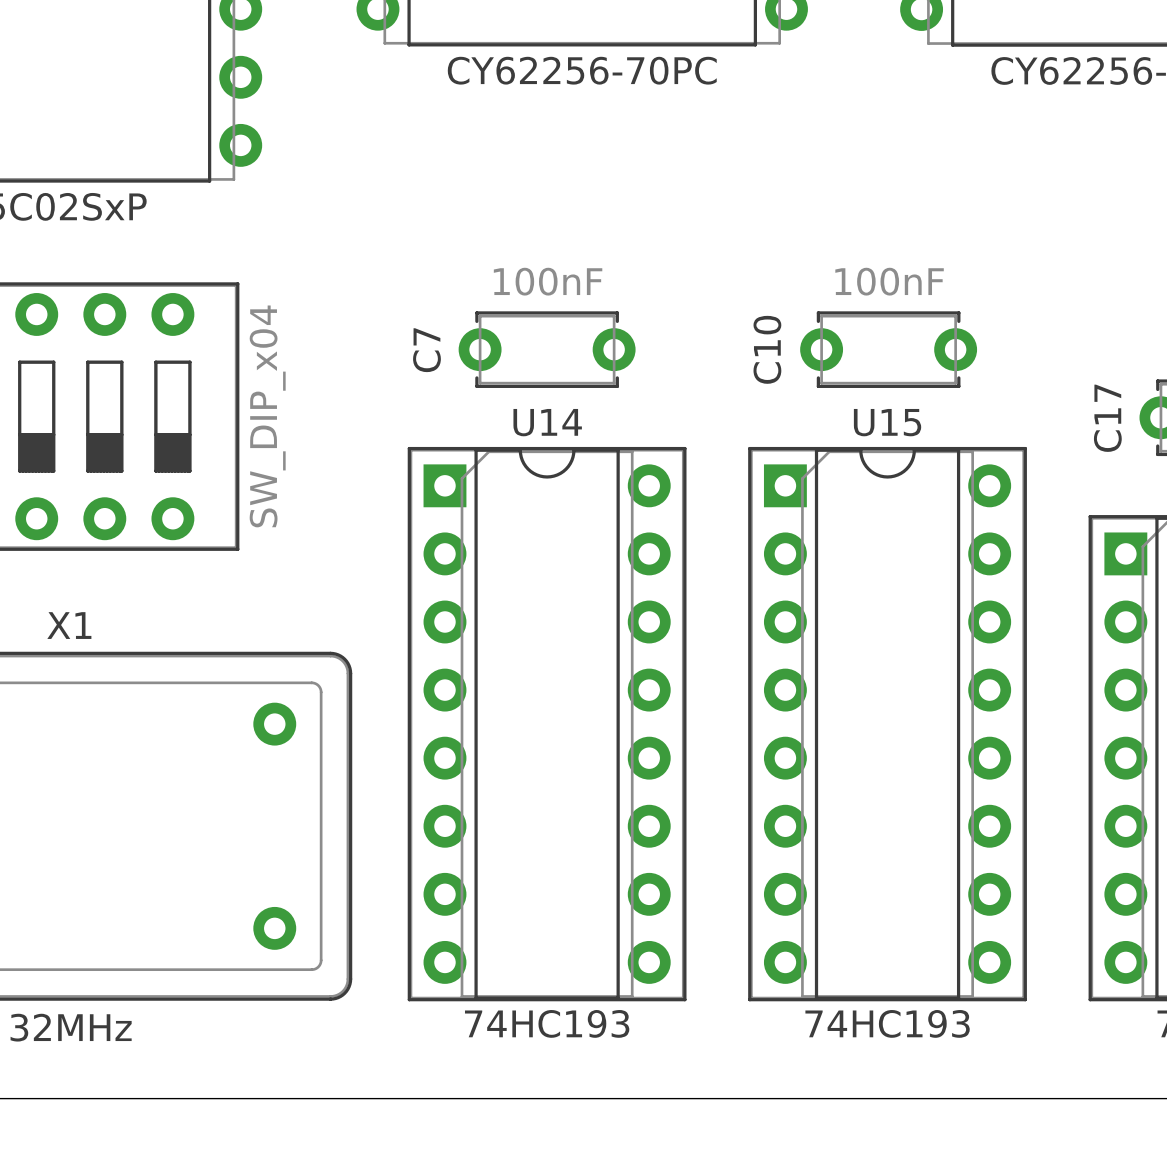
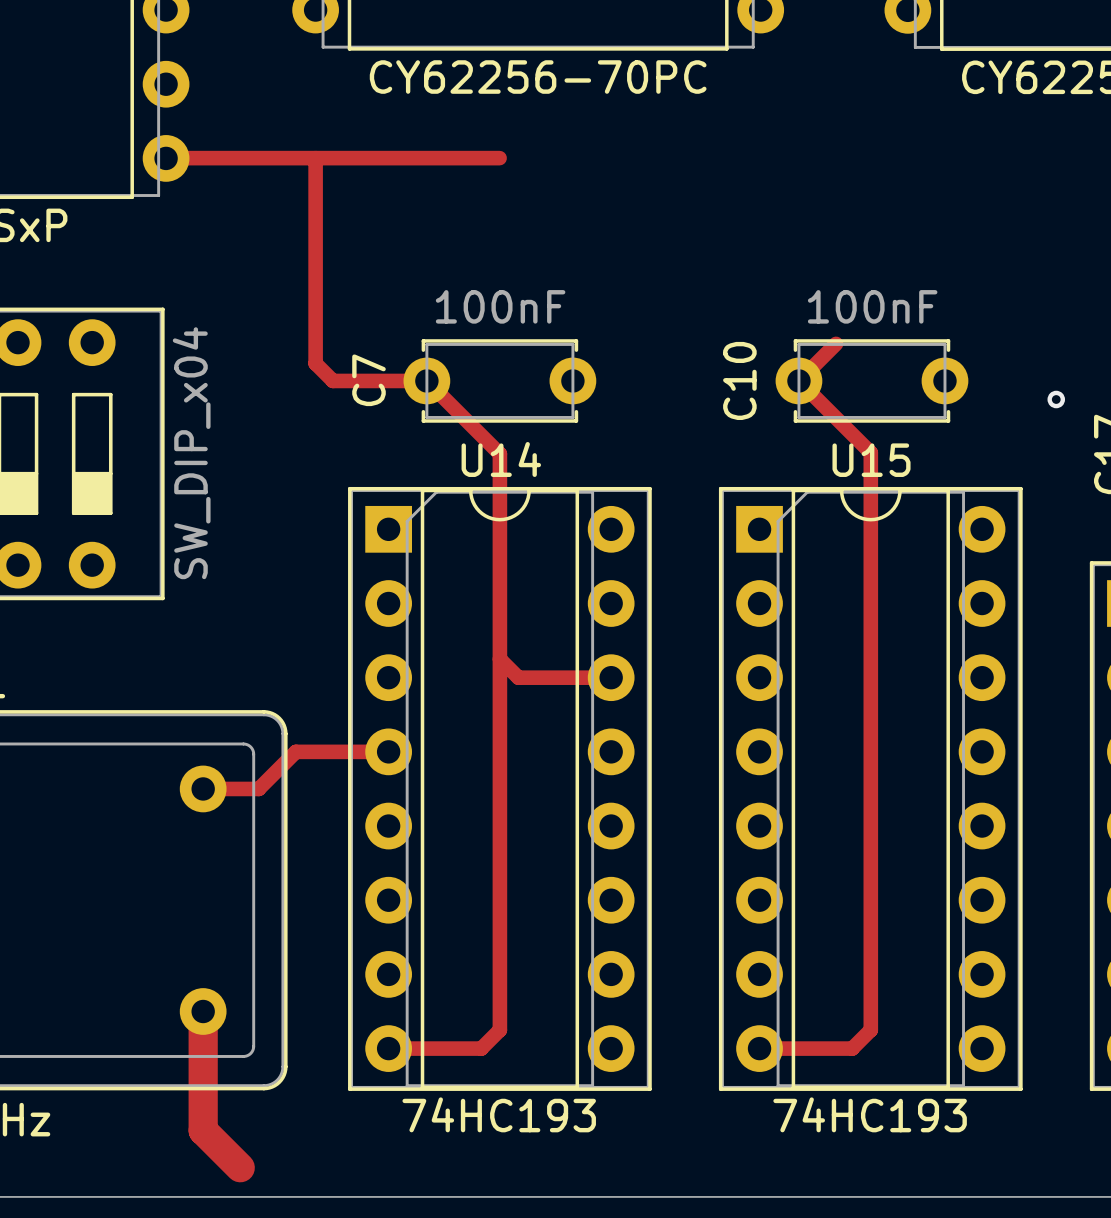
track: none -> (184, 158) (499, 158)
track: none -> (315, 158) (315, 363) (332, 380) (426, 380) (499, 453) (499, 1030) (481, 1048) (388, 1048)
track: none -> (836, 343) (798, 380) (870, 452) (870, 1030) (852, 1048) (759, 1048)
via: none -> (1056, 399)
track: none -> (499, 659) (518, 677) (611, 677)
track: none -> (388, 751) (295, 751) (258, 788) (203, 788)
track: none -> (203, 1011) (203, 1130) (240, 1167)

